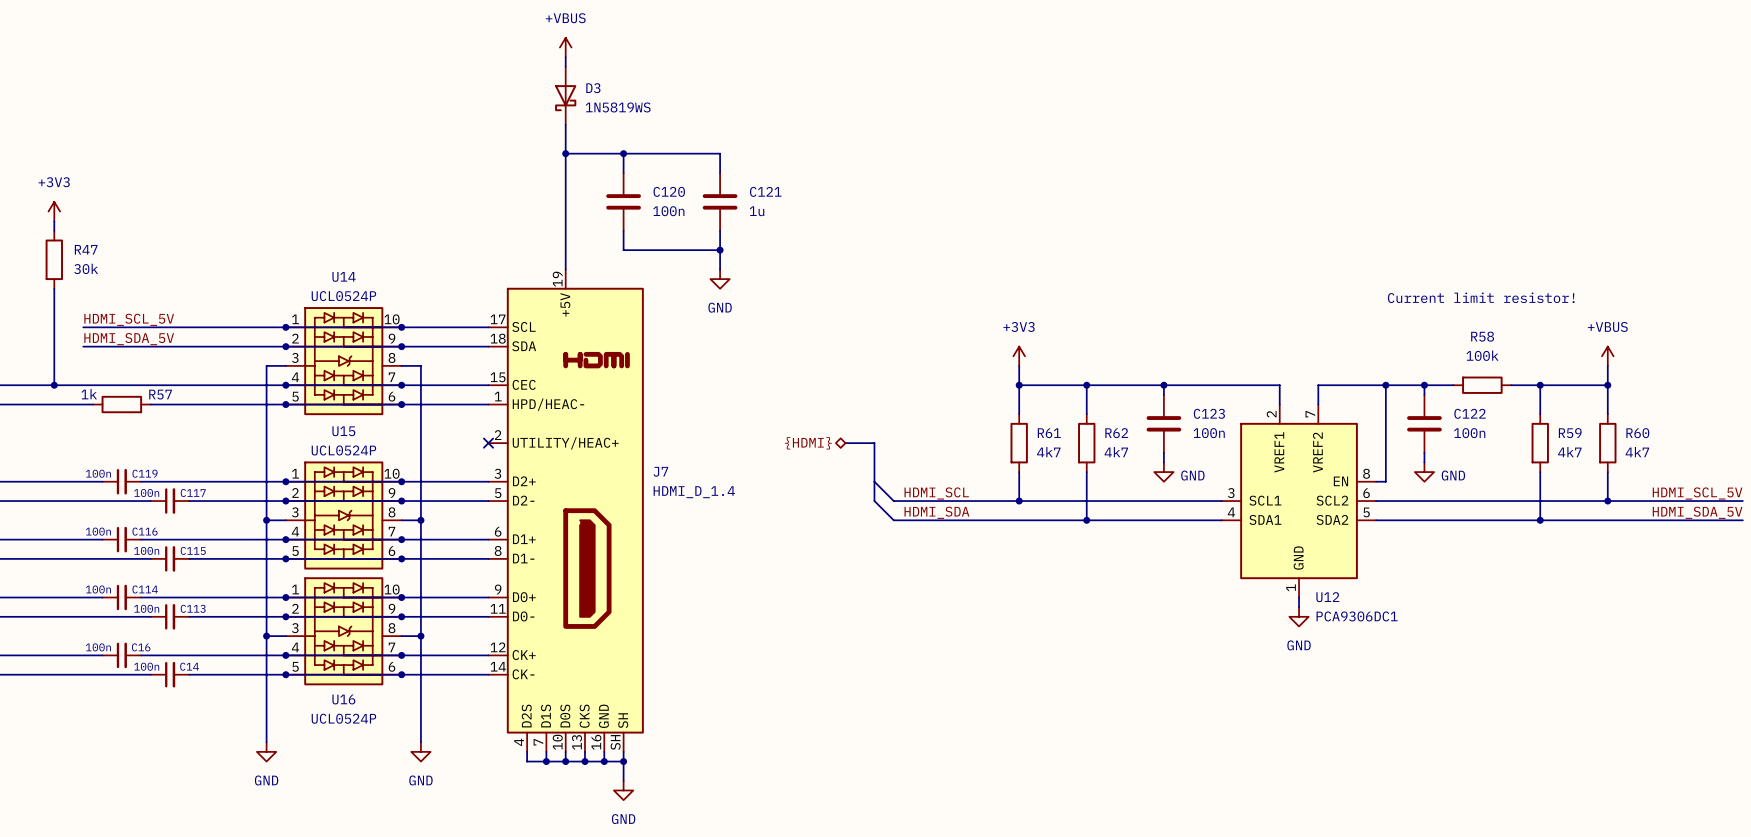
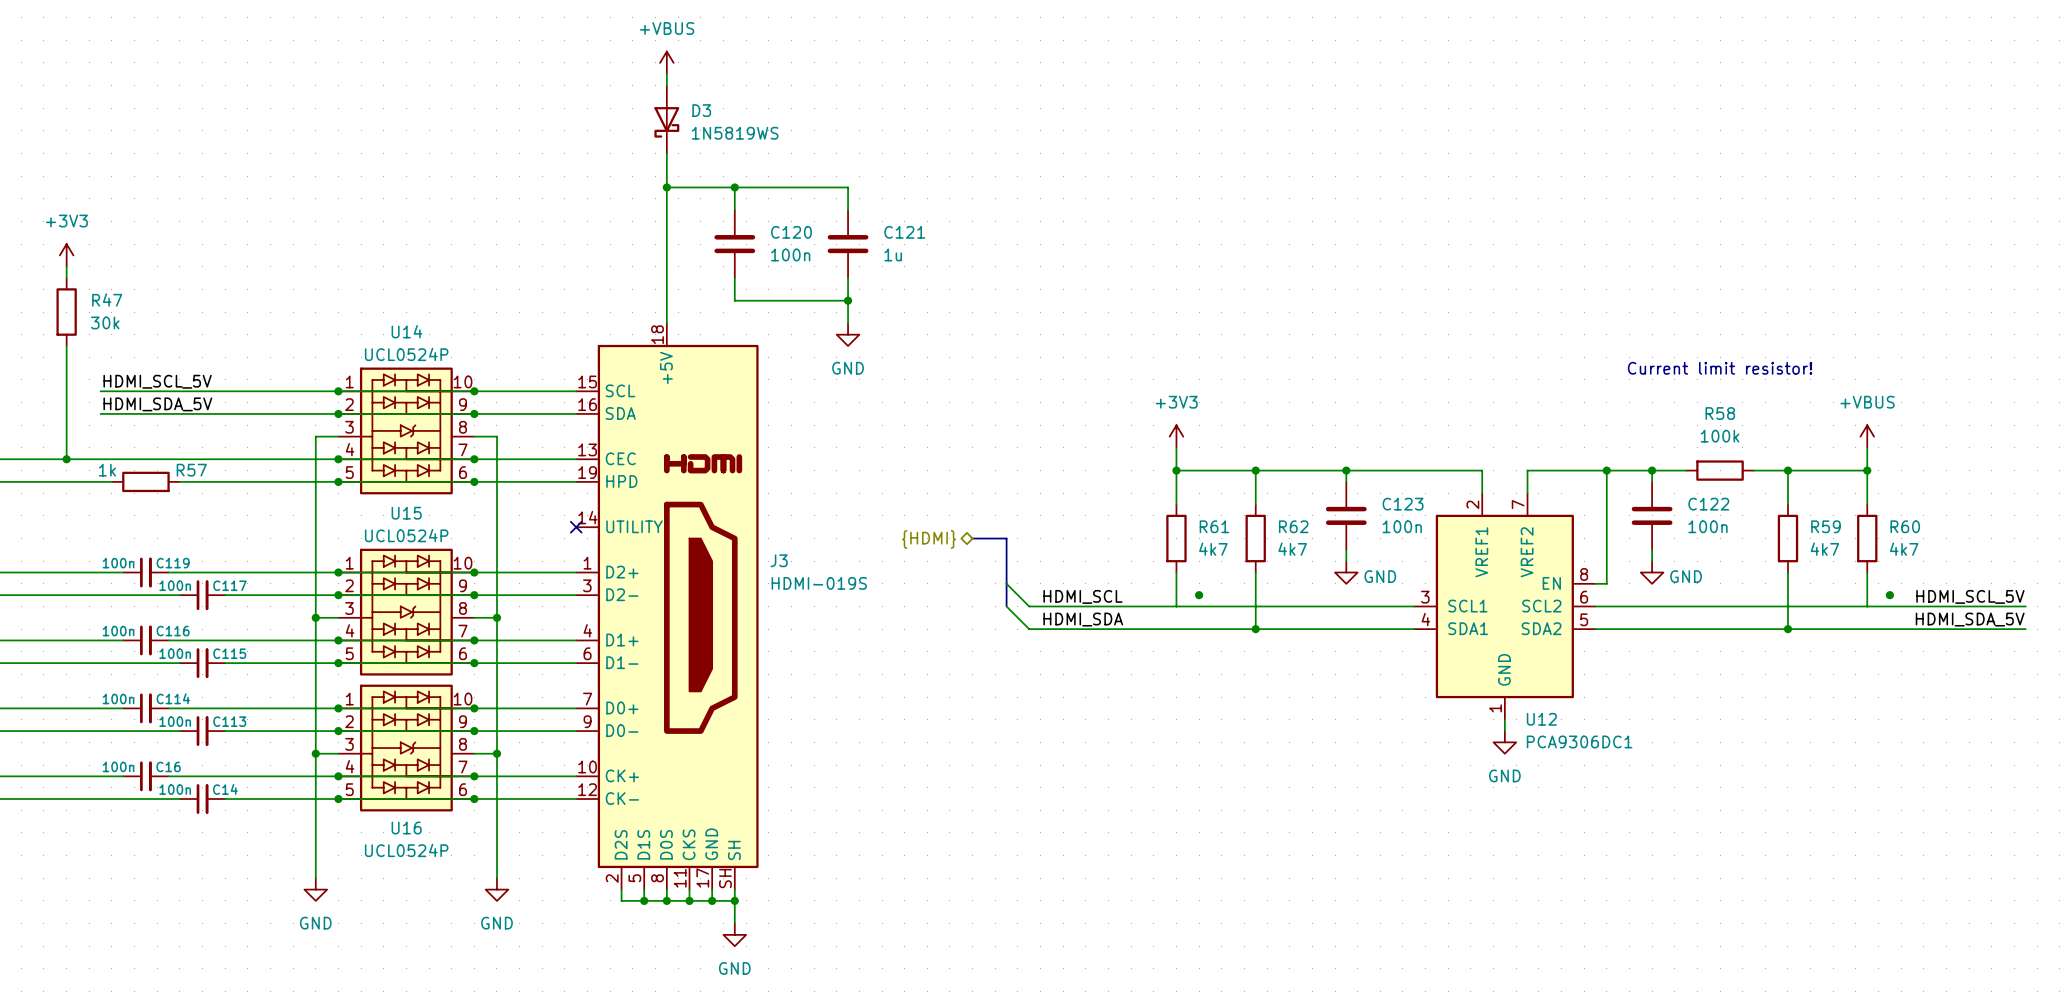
text position: Current limit resistor! (1481, 297) -> Current limit resistor! (1720, 368)
power symbol position: +3V3 (1019, 356) -> +3V3 (1176, 436)
power symbol position: +VBUS (1607, 356) -> +VBUS (1867, 436)
wire: (1019, 365) (1019, 414) -> (1176, 447) (1176, 504)
wire: (1607, 365) (1607, 414) -> (1867, 447) (1867, 504)
wire: (1019, 385) (1279, 385) (1279, 404) -> (1176, 470) (1482, 470) (1482, 493)
junction position: (1019, 385) -> (1176, 470)
wire: (1086, 385) (1086, 414) -> (1255, 470) (1255, 504)
junction position: (1086, 385) -> (1255, 470)
wire: (1163, 385) (1163, 394) -> (1346, 470) (1346, 481)
junction position: (1163, 385) -> (1346, 470)
wire: (1385, 385) (1385, 481) (1376, 481) -> (1606, 470) (1606, 583) (1595, 583)
junction: (1385, 385) -> none
wire: (1424, 385) (1424, 394) -> (1652, 470) (1652, 481)
junction: (1424, 385) -> none
wire: (1453, 385) (1318, 385) (1318, 404) -> (1686, 470) (1527, 470) (1527, 493)
R58 position: (1482, 385) -> (1720, 470)
wire: (1511, 385) (1607, 385) -> (1754, 470) (1867, 470)
wire: (1540, 385) (1540, 414) -> (1787, 470) (1787, 504)
junction position: (1540, 385) -> (1787, 470)
junction position: (1607, 385) -> (1867, 470)
junction: none -> (1606, 470)
junction: none -> (1652, 470)
C123 position: (1163, 423) -> (1346, 515)
C122 position: (1424, 423) -> (1652, 515)
hierarchical label position: {HDMI} (808, 443) -> {HDMI} (929, 539)
bus: (845, 443) (874, 443) (874, 501) -> (972, 538) (1006, 538) (1006, 606)
R61 position: (1019, 443) -> (1176, 538)
R62 position: (1086, 443) -> (1255, 538)
R59 position: (1540, 443) -> (1787, 538)
R60 position: (1607, 443) -> (1867, 538)
wire: (1163, 452) (1163, 462) -> (1346, 549) (1346, 561)
wire: (1424, 452) (1424, 462) -> (1652, 549) (1652, 561)
wire: (1019, 472) (1019, 501) -> (1176, 572) (1176, 606)
wire: (1086, 472) (1086, 520) -> (1255, 572) (1255, 629)
power symbol position: GND (1163, 472) -> GND (1346, 572)
power symbol position: GND (1424, 472) -> GND (1652, 572)
wire: (1540, 472) (1540, 520) -> (1787, 572) (1787, 629)
wire: (1607, 472) (1607, 501) -> (1867, 572) (1867, 606)
wire: (874, 481) (893, 501) (1221, 501) -> (1006, 583) (1029, 606) (1414, 606)
label position: HDMI_SCL (936, 493) -> HDMI_SCL (1082, 596)
label position: HDMI_SCL_5V (1697, 493) -> HDMI_SCL_5V (1970, 596)
wire: (874, 501) (893, 520) (1221, 520) -> (1006, 606) (1029, 629) (1414, 629)
U12 position: (1299, 501) -> (1504, 606)
wire: (1376, 501) (1742, 501) -> (1595, 606) (2025, 606)
J7: HDMI_D_1.4 (566, 510) -> none
J3: none -> HDMI-019S (667, 606)
label position: HDMI_SDA (936, 512) -> HDMI_SDA (1083, 619)
label position: HDMI_SDA_5V (1697, 512) -> HDMI_SDA_5V (1970, 619)
junction position: (1086, 520) -> (1255, 629)
wire: (1376, 520) (1742, 520) -> (1595, 629) (2025, 629)
junction position: (1540, 520) -> (1787, 629)
wire: (1299, 597) (1299, 607) -> (1504, 719) (1504, 731)
power symbol position: GND (1299, 616) -> GND (1504, 742)

